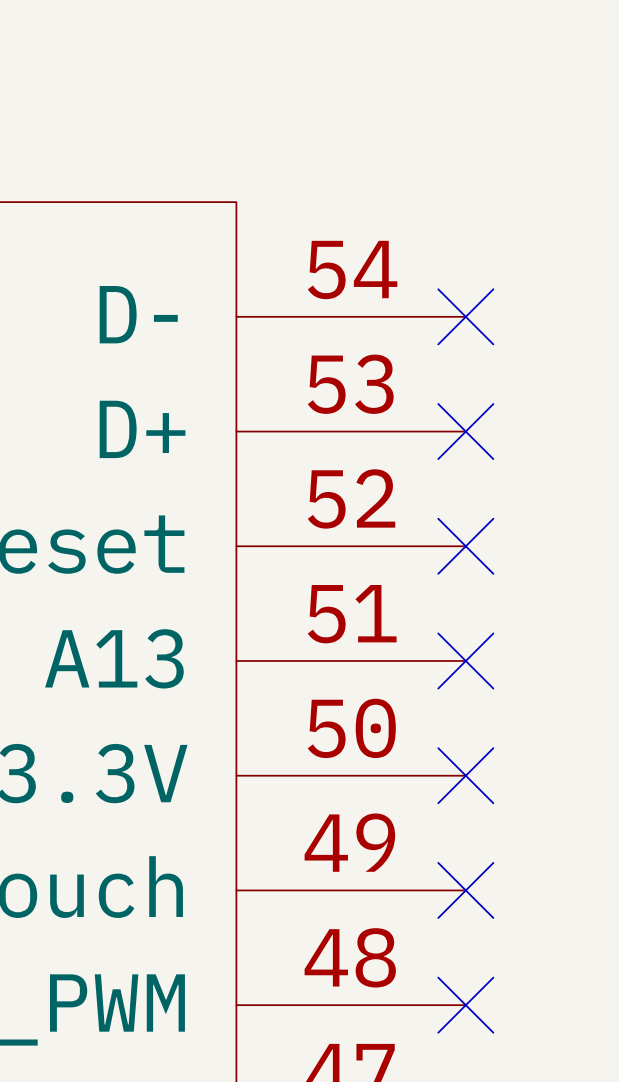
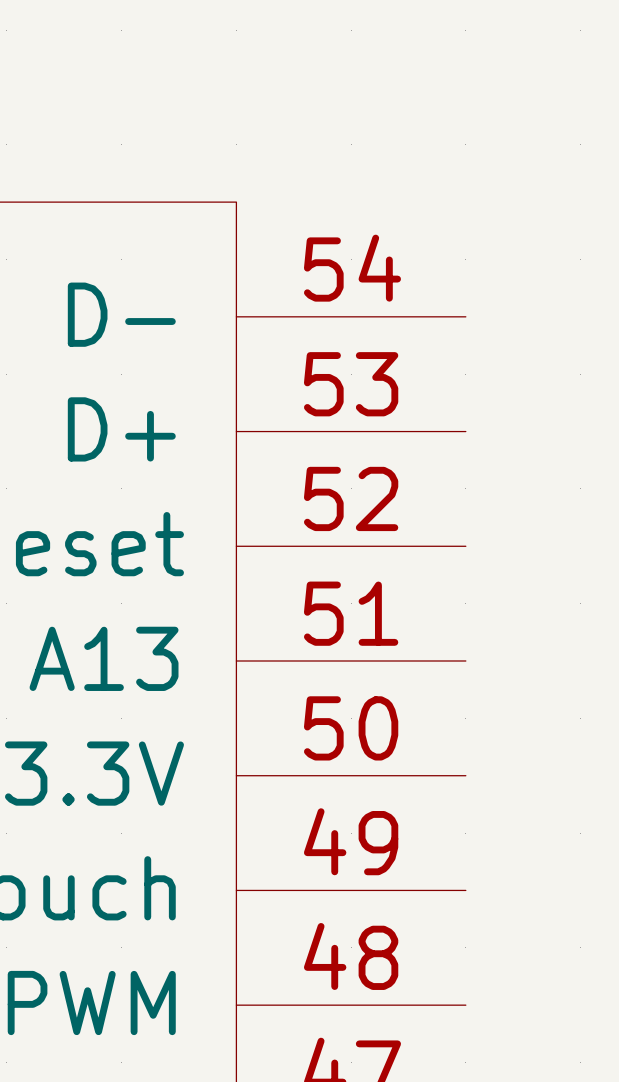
no-connect mark: (465, 316) -> none
no-connect mark: (465, 431) -> none
no-connect mark: (465, 546) -> none
no-connect mark: (465, 660) -> none
no-connect mark: (465, 775) -> none
no-connect mark: (465, 890) -> none
no-connect mark: (465, 1005) -> none

